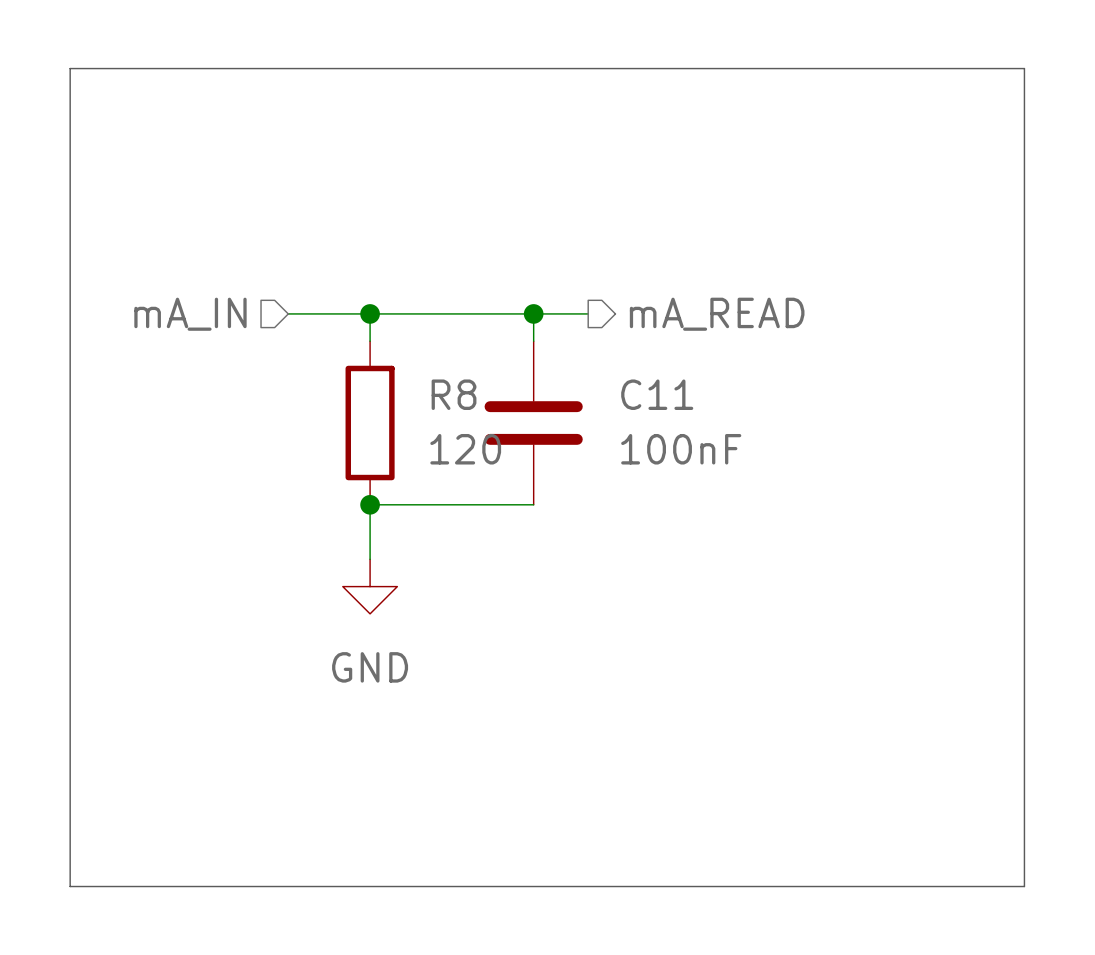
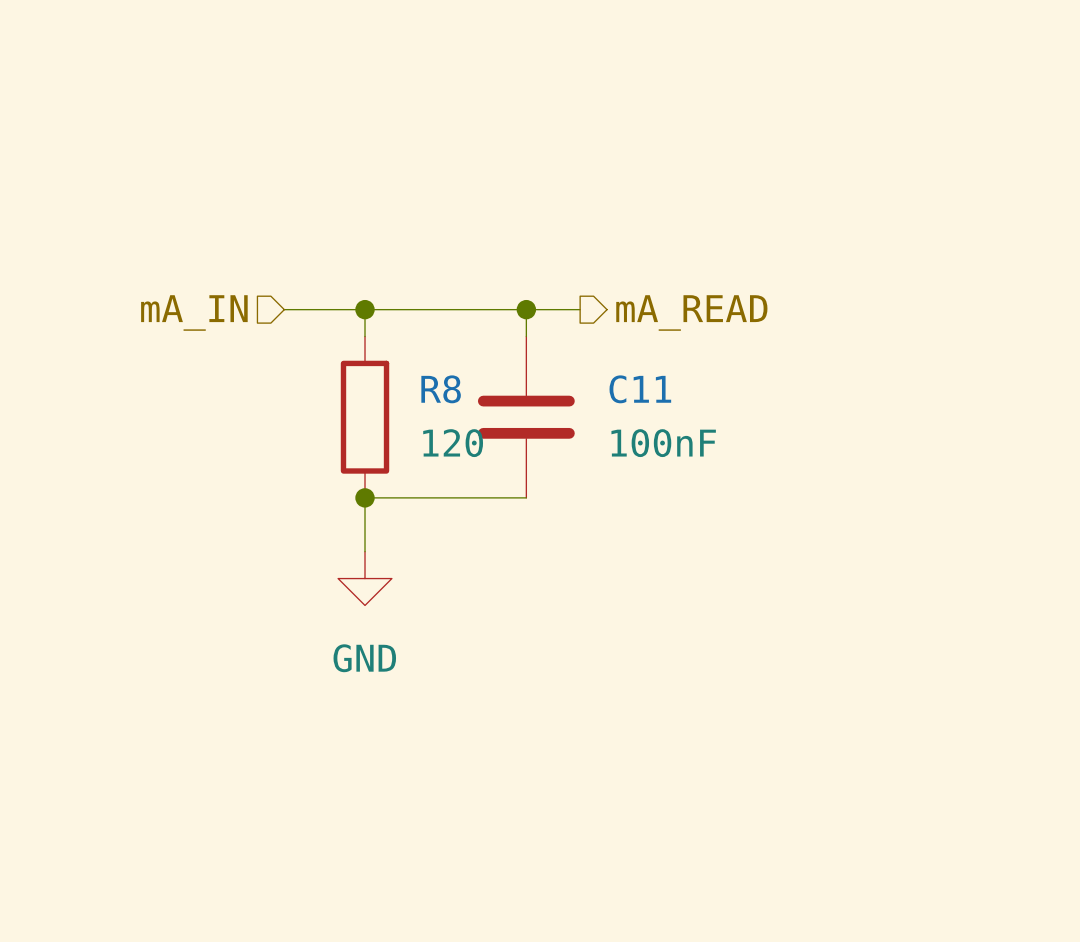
line: (70, 68) (1024, 68) (1024, 886) (70, 886) (70, 68) -> none

